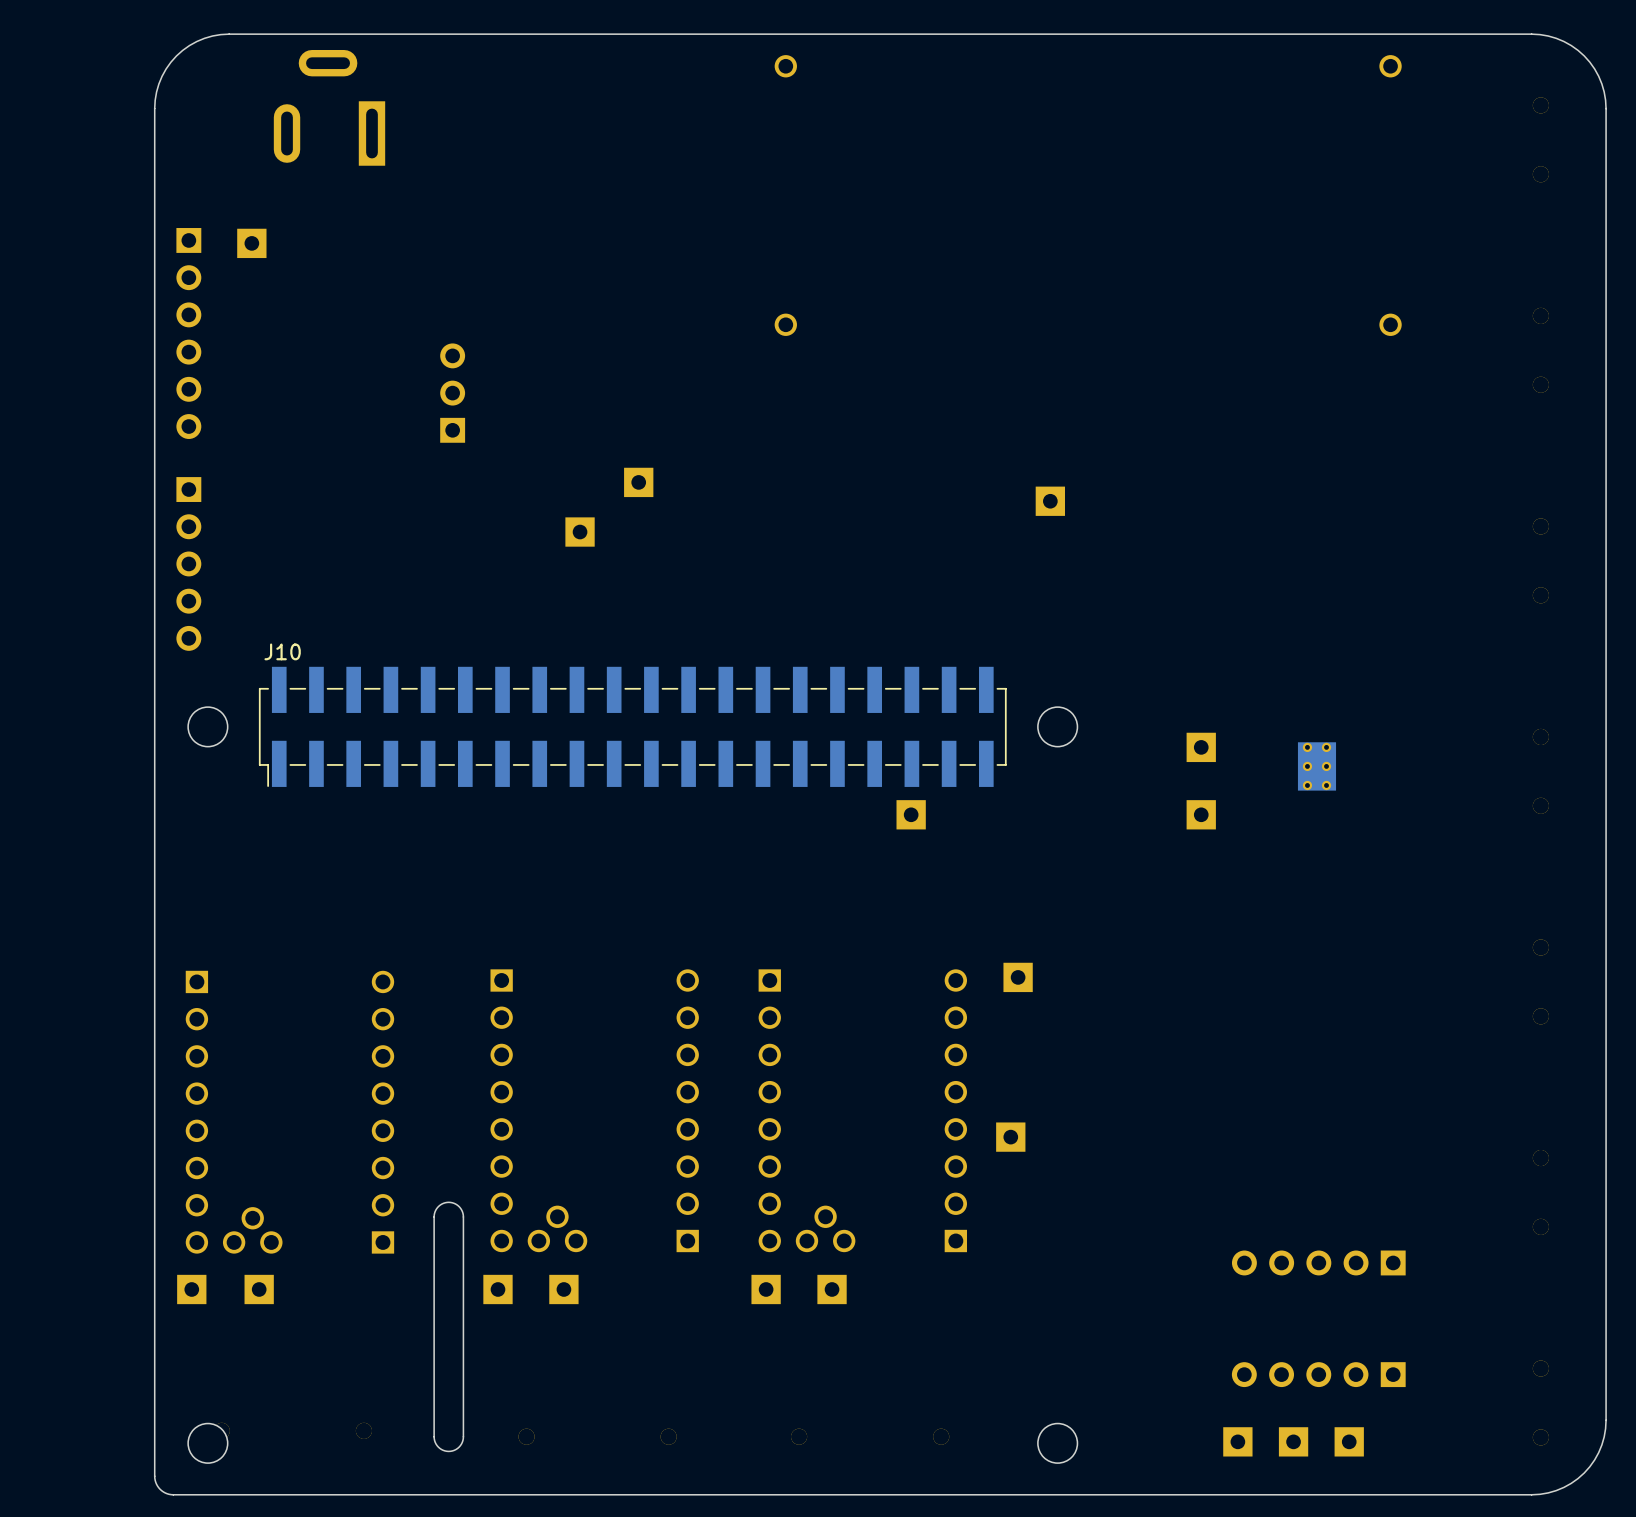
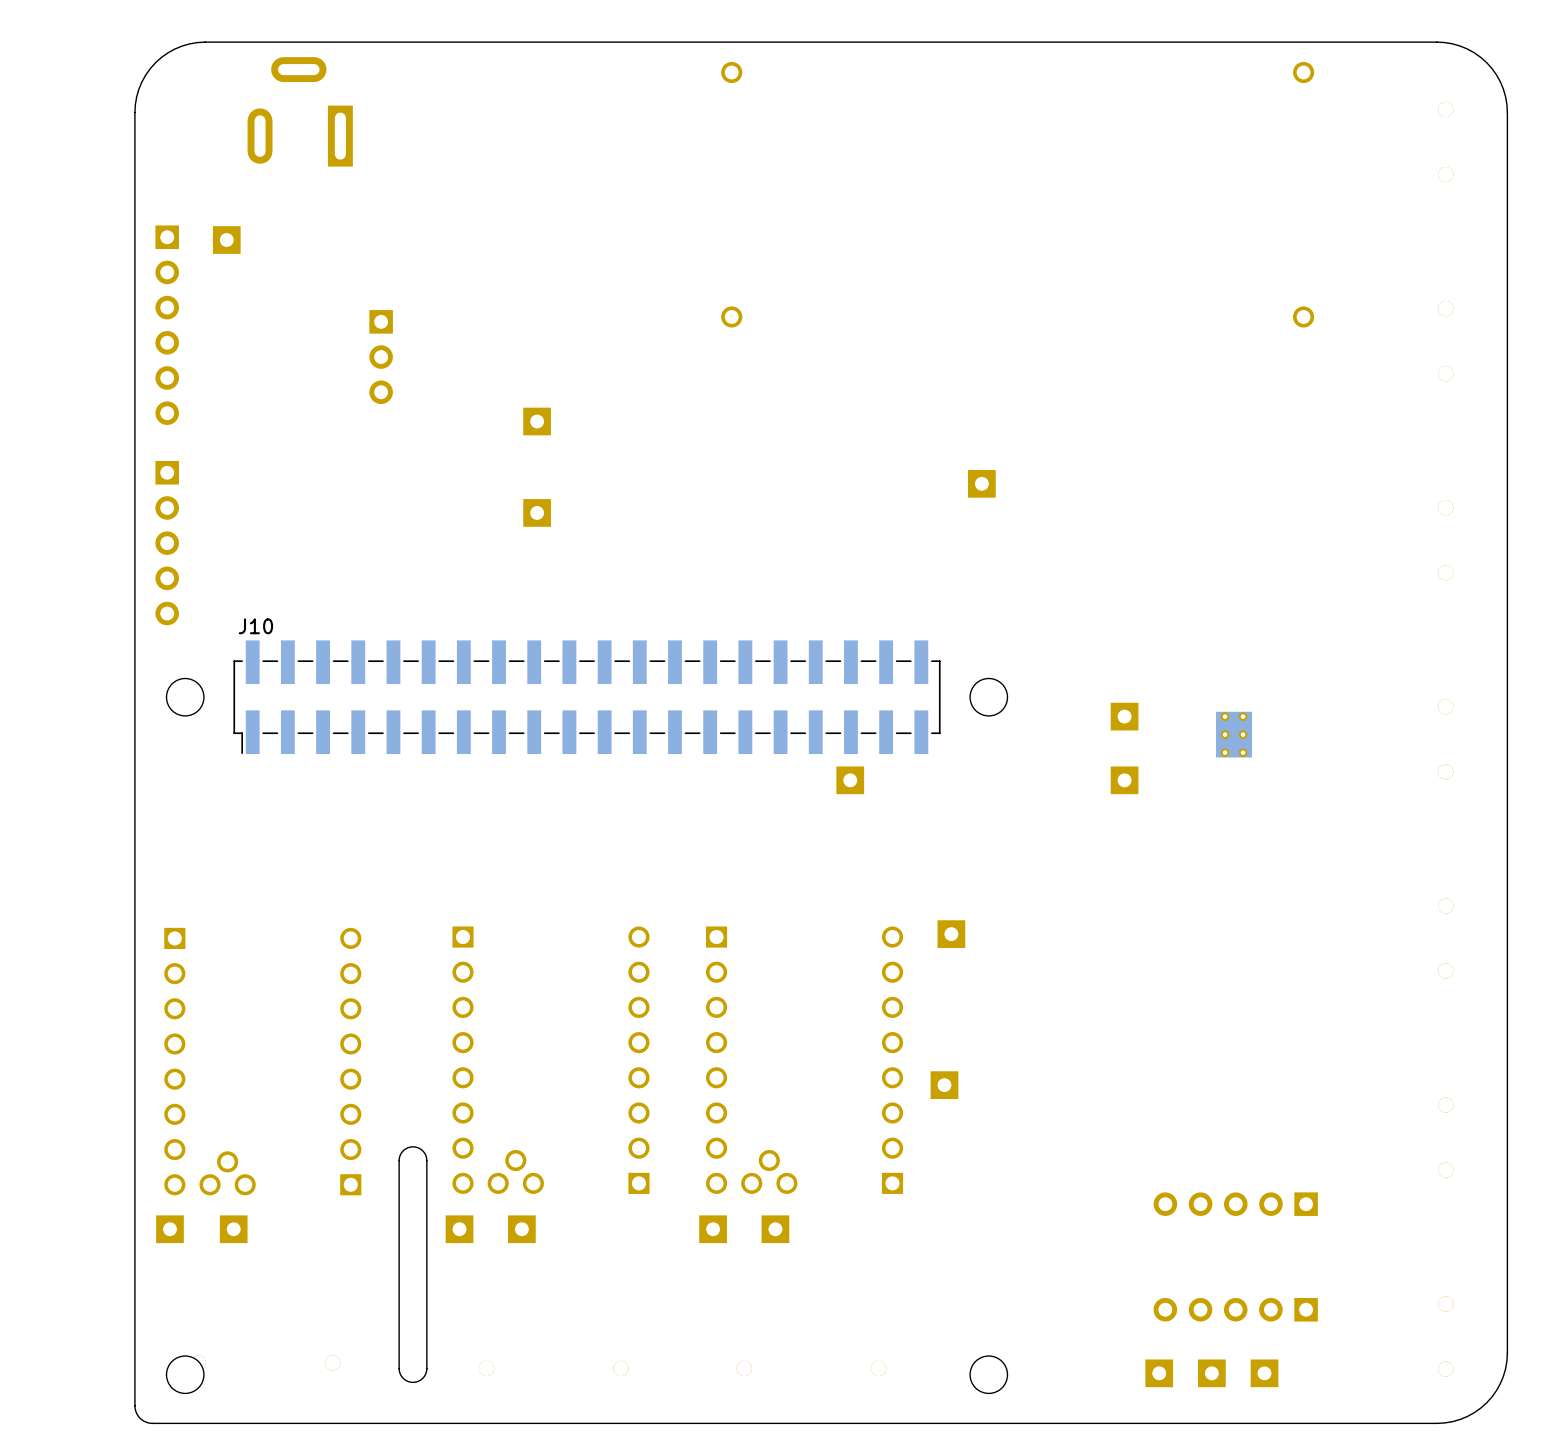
part rotation: 0° (452, 393) -> 180° (381, 357)
part position: (638, 482) -> (537, 421)

